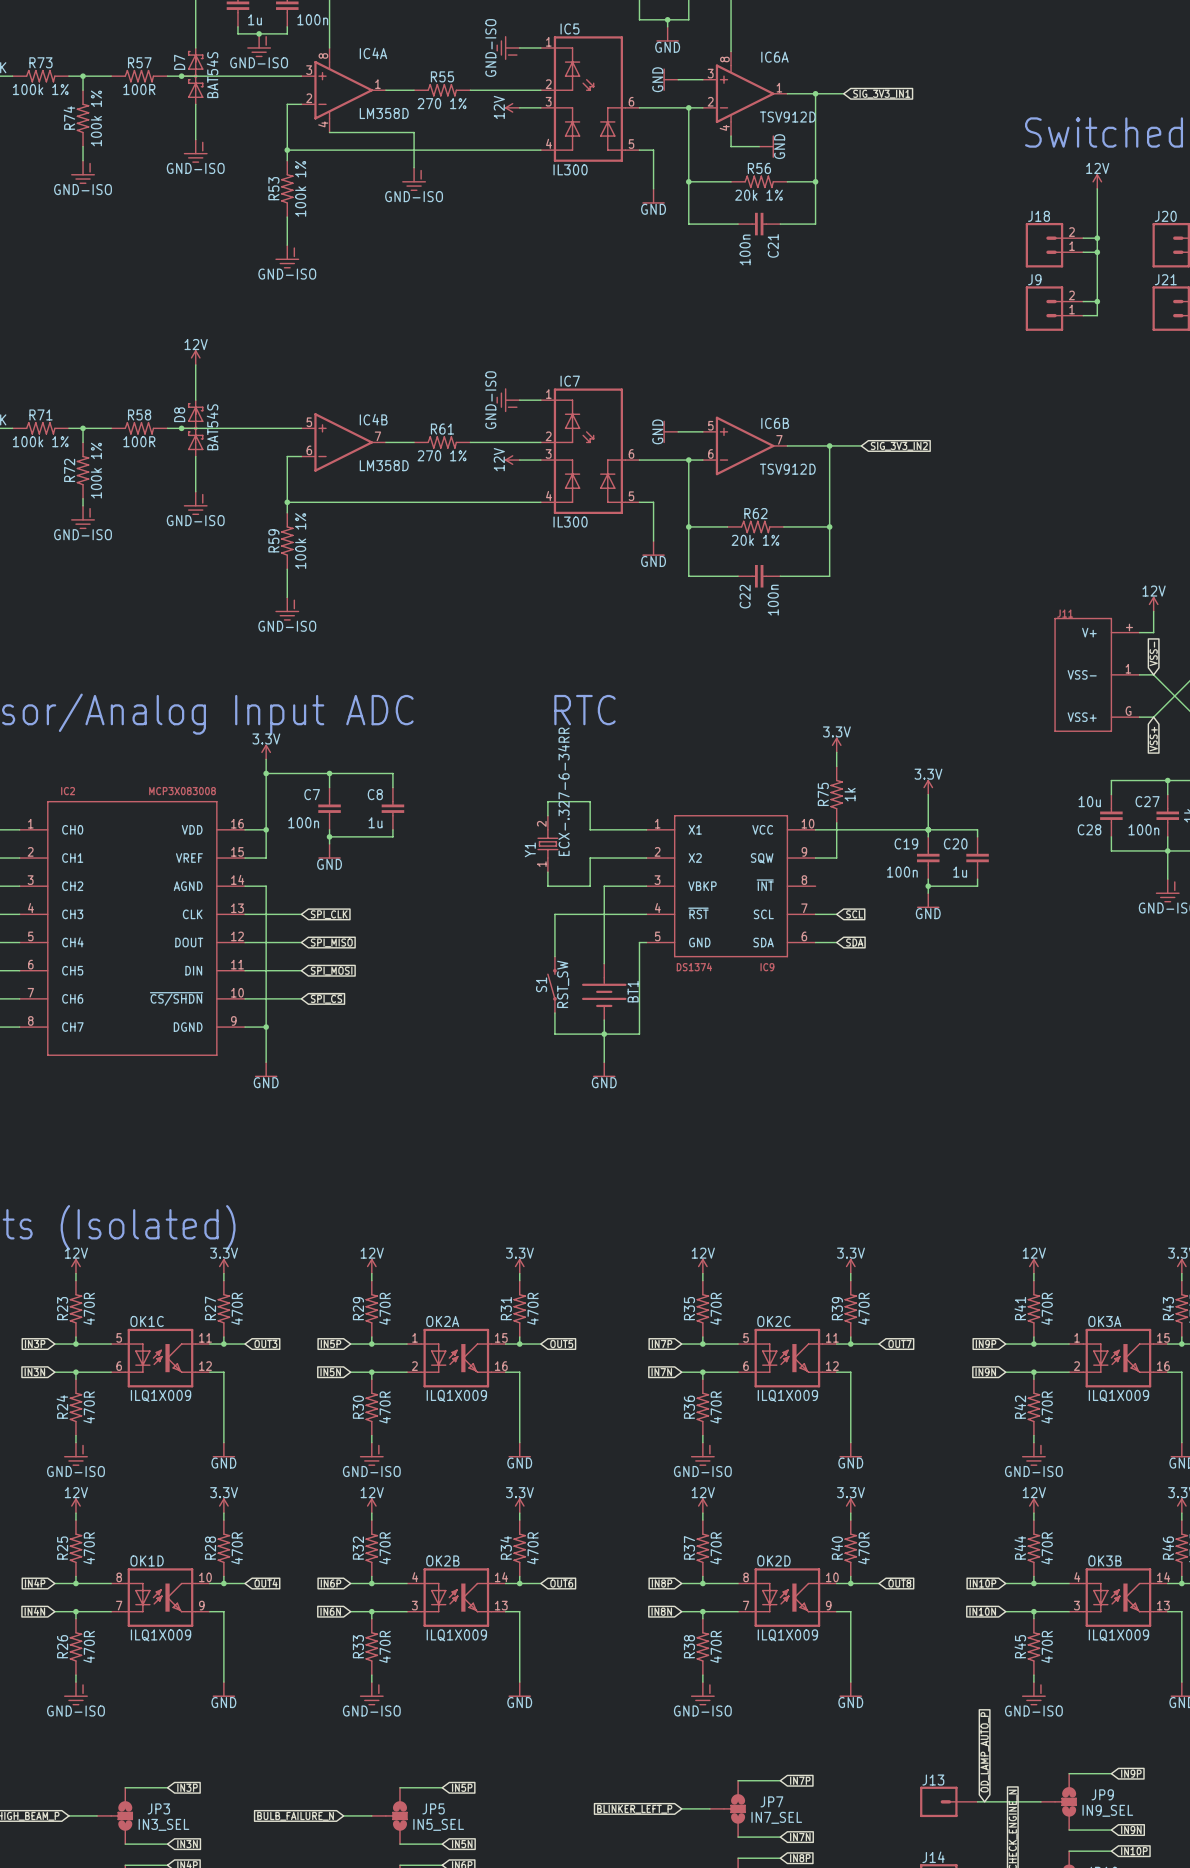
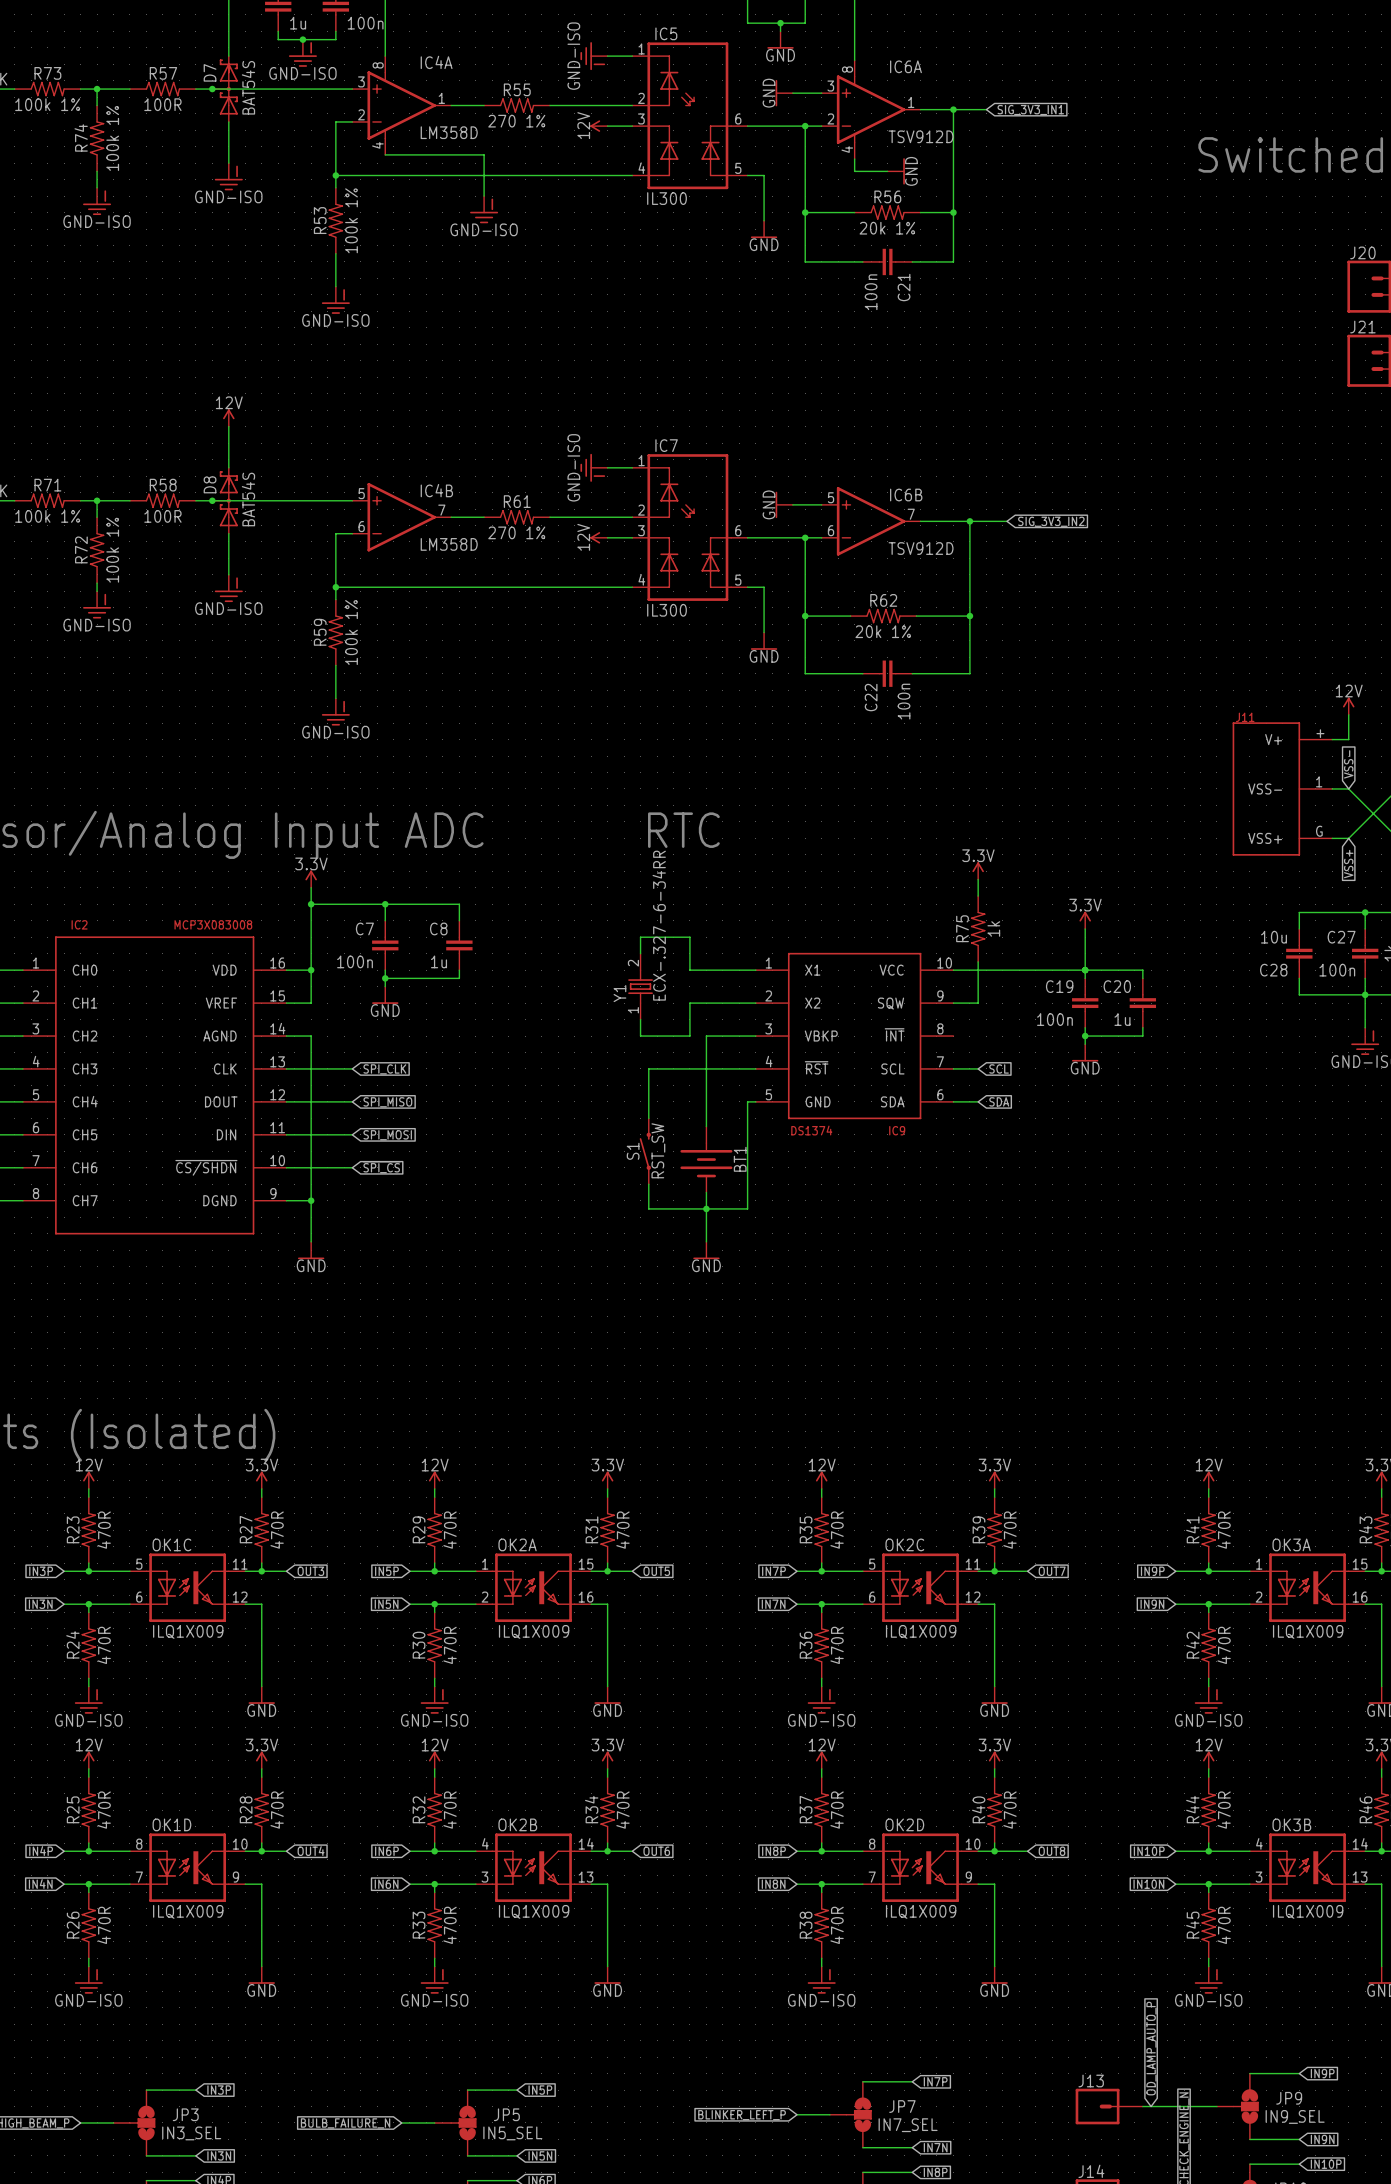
power symbol: 12V (1097, 181) -> none
wire: (1097, 188) (1097, 315) (1083, 315) -> none
wire: (1083, 238) (1097, 238) -> none
junction: (1097, 238) -> none
J18: (1054, 245) -> none
wire: (1083, 252) (1097, 252) -> none
junction: (1097, 252) -> none
wire: (1083, 301) (1097, 301) -> none
junction: (1097, 301) -> none
J9: (1054, 308) -> none

